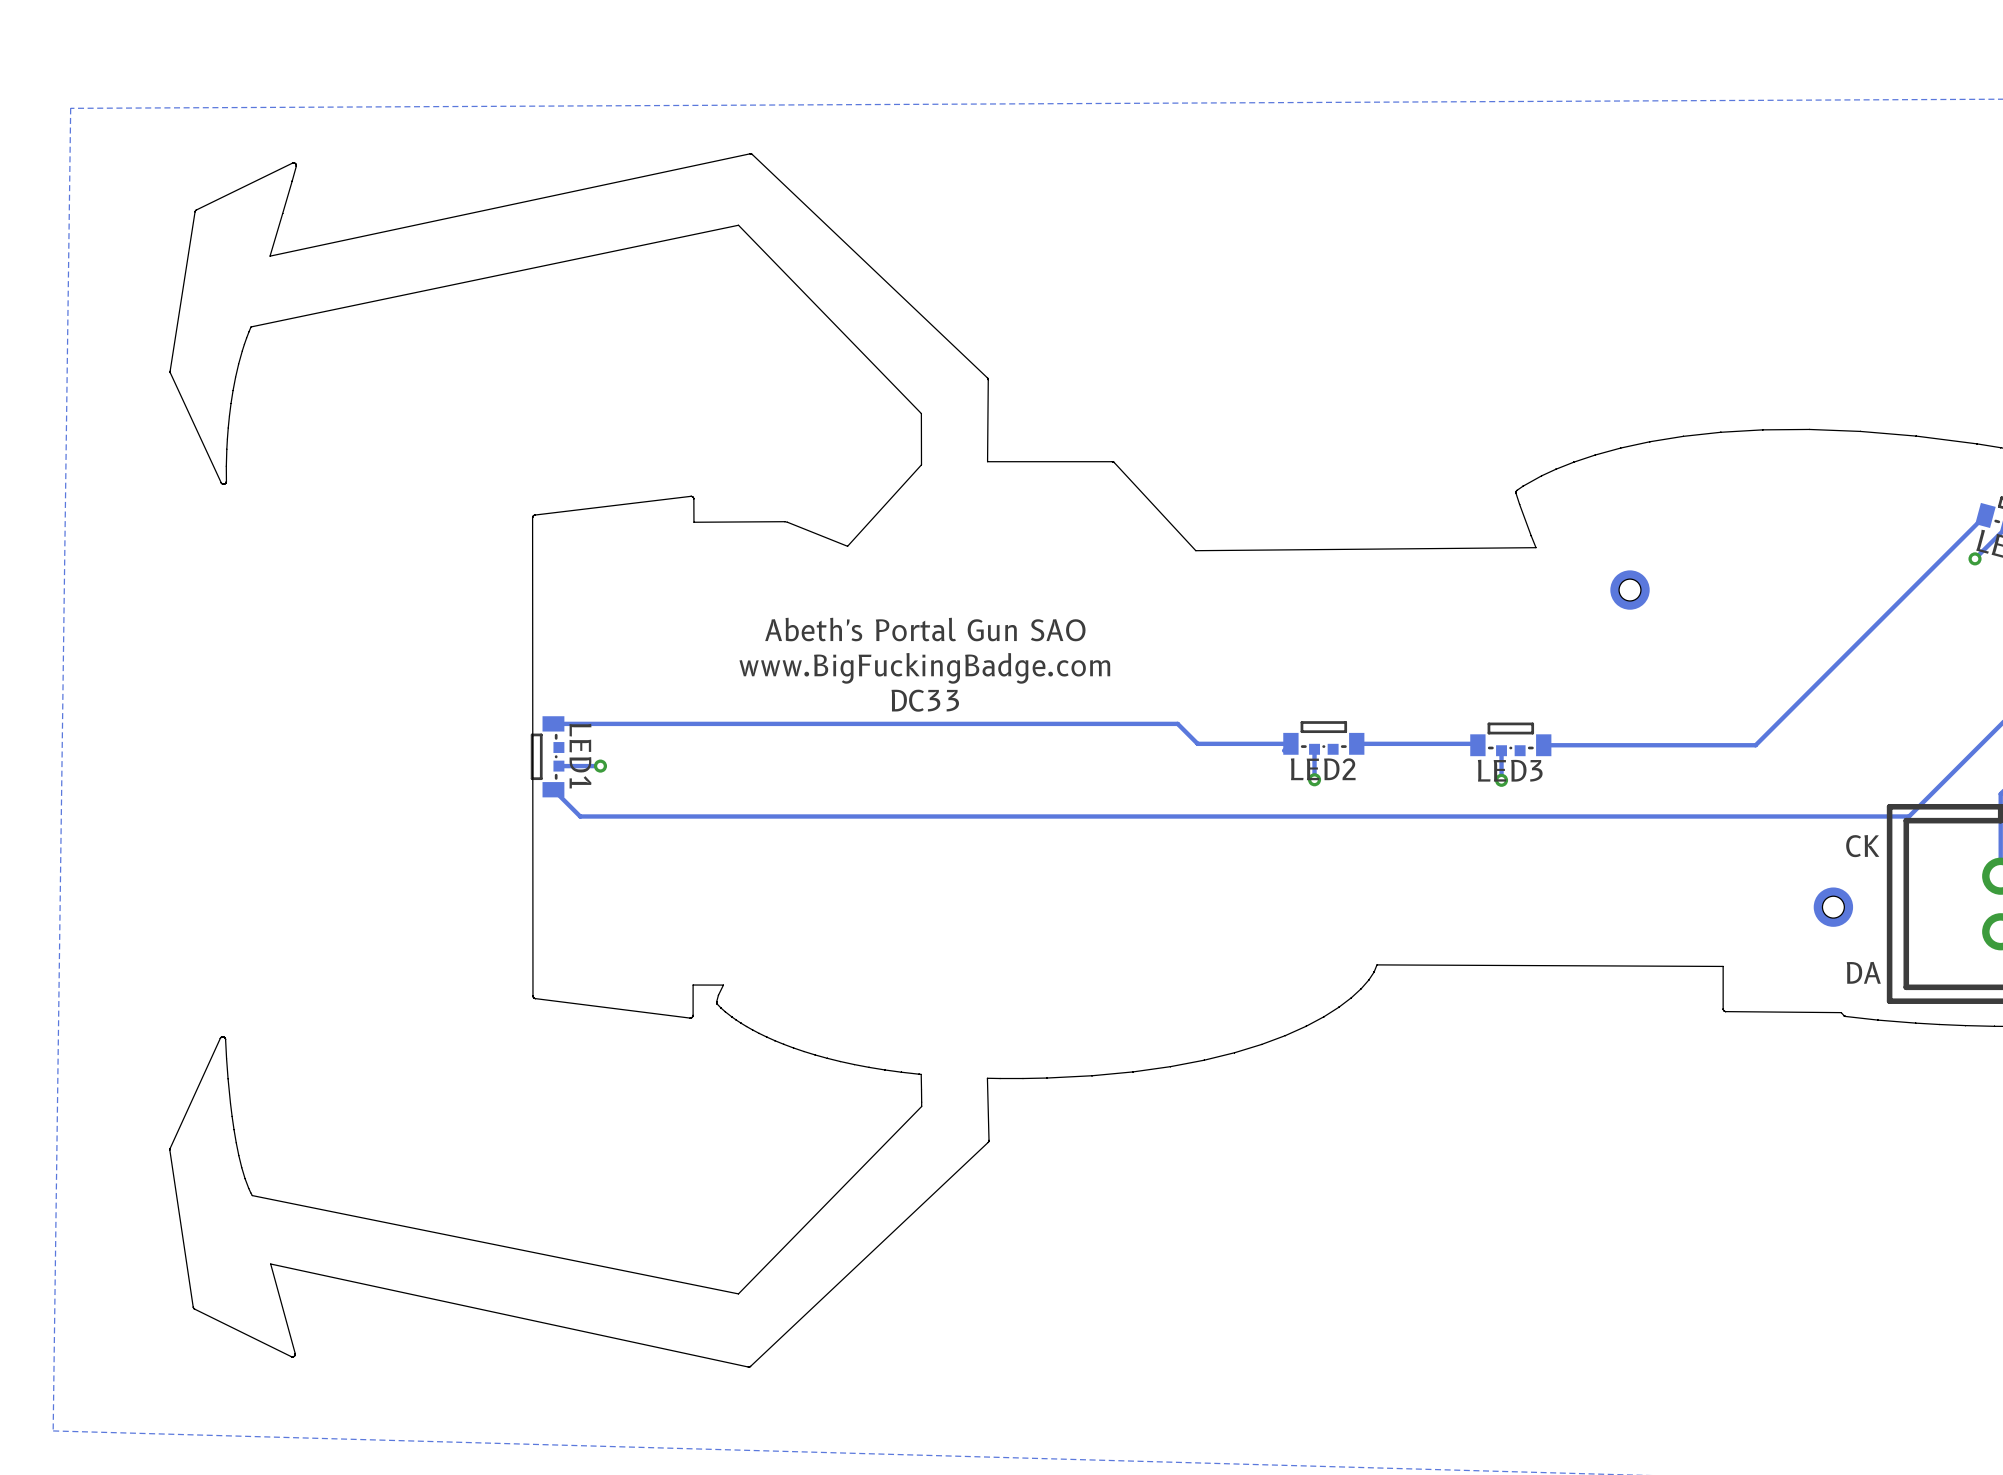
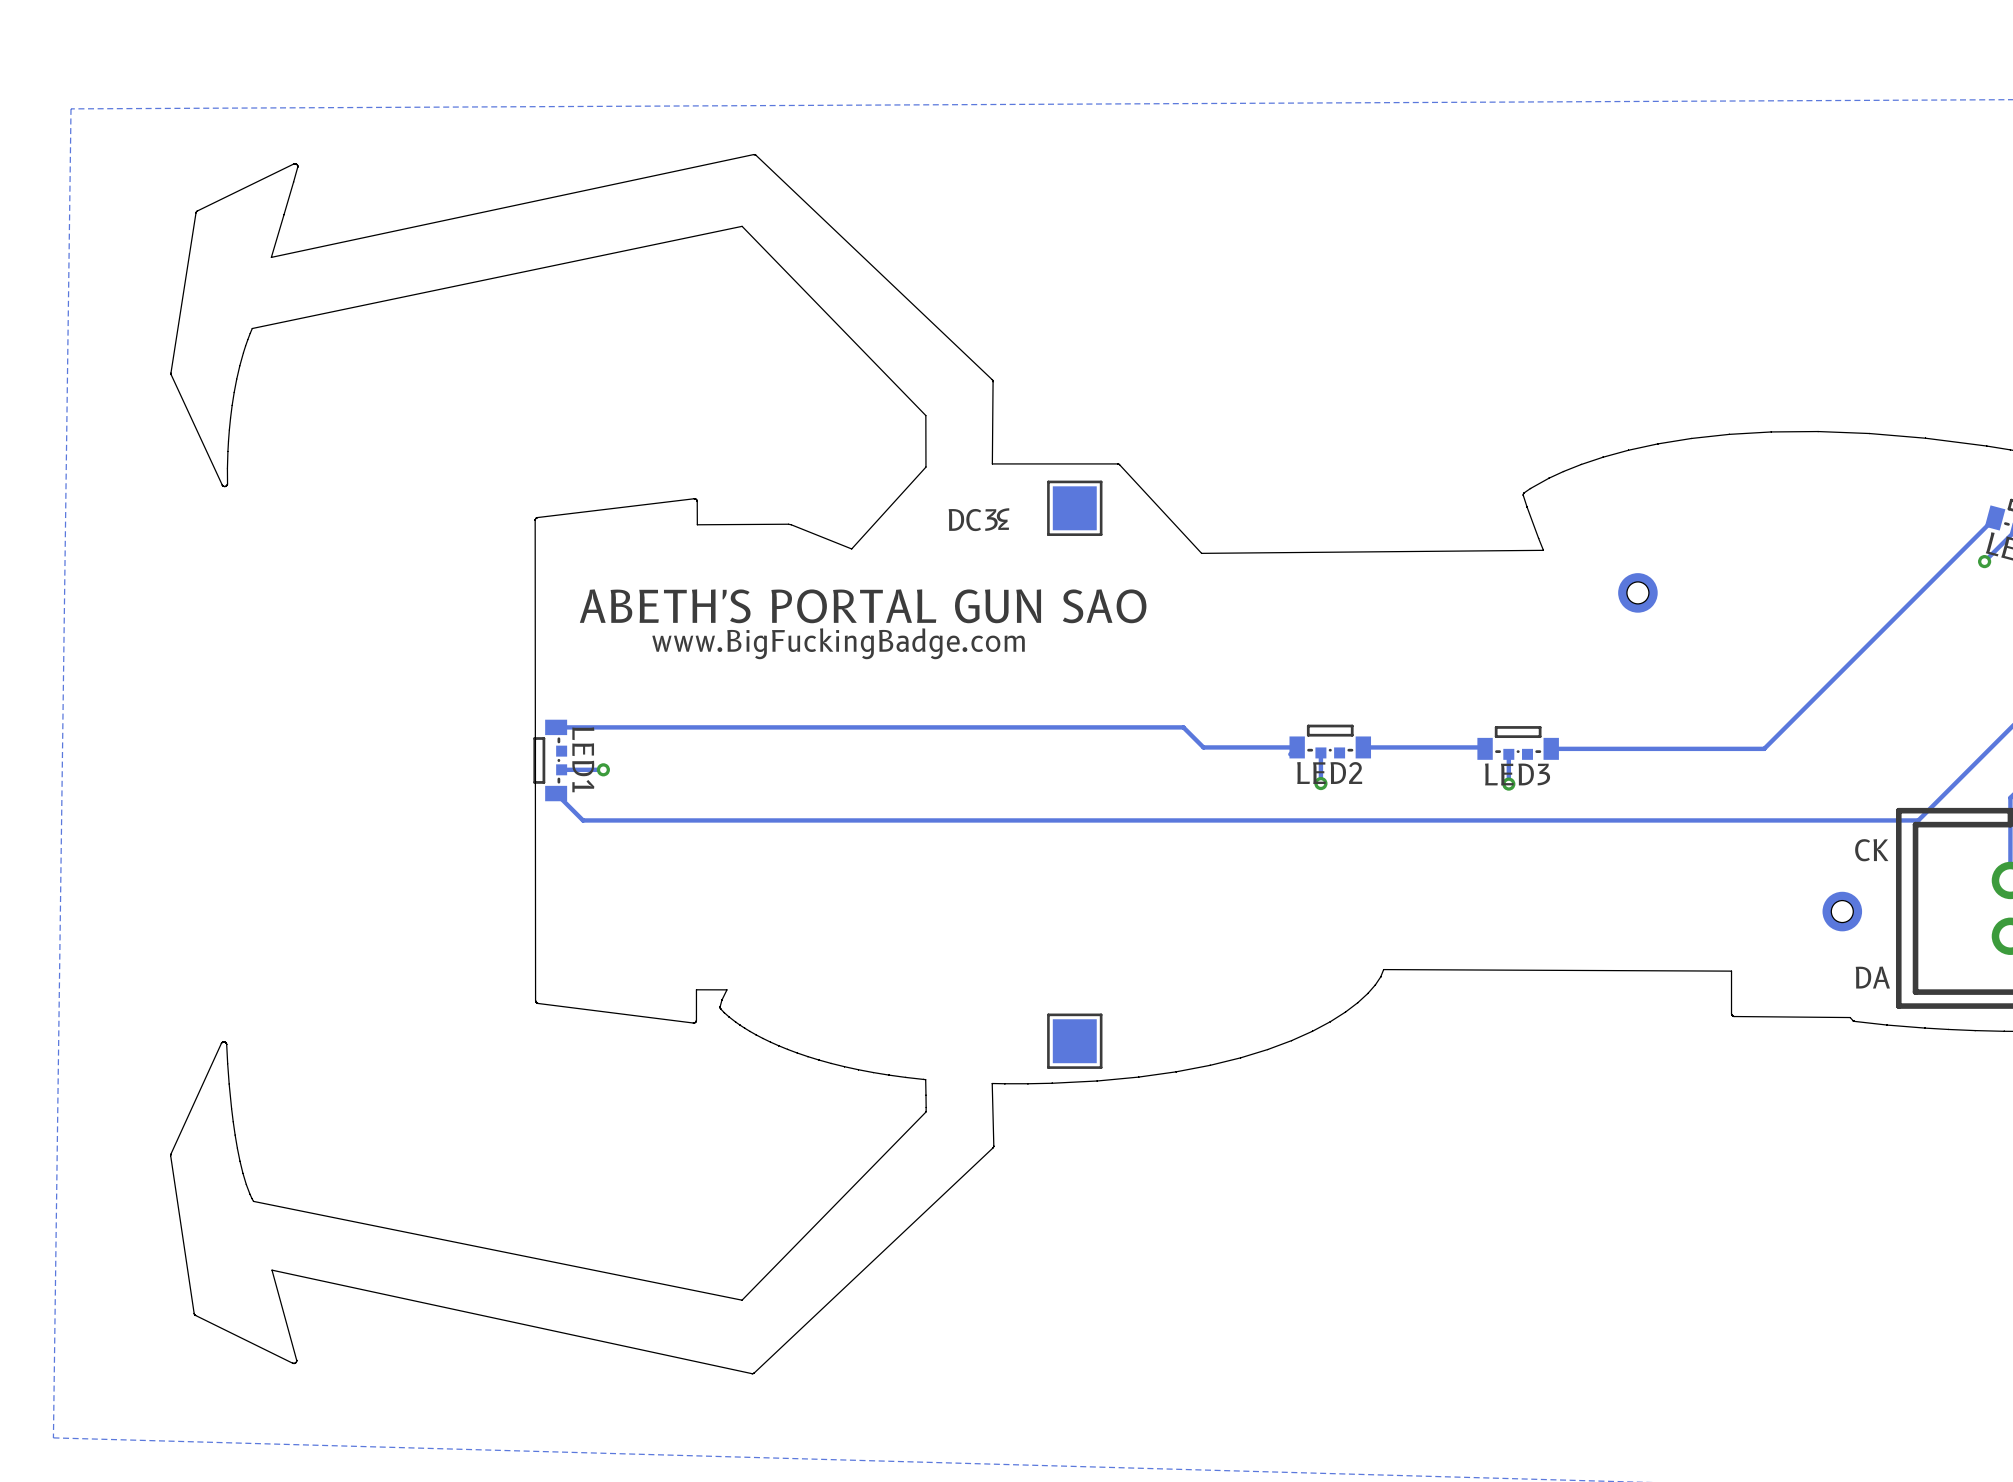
part: none -> (1074, 508)
text: none -> 3 (1003, 519)
text: none -> DC3 (973, 520)
text: none -> ABETH'S PORTAL GUN SAO (863, 606)
text: Abeth's Portal Gun SAO (925, 629) -> none
text position: www.BigFuckingBadge.com (924, 668) -> www.BigFuckingBadge.com (838, 643)
text: DC33 (925, 700) -> none
part: none -> (1074, 1041)

